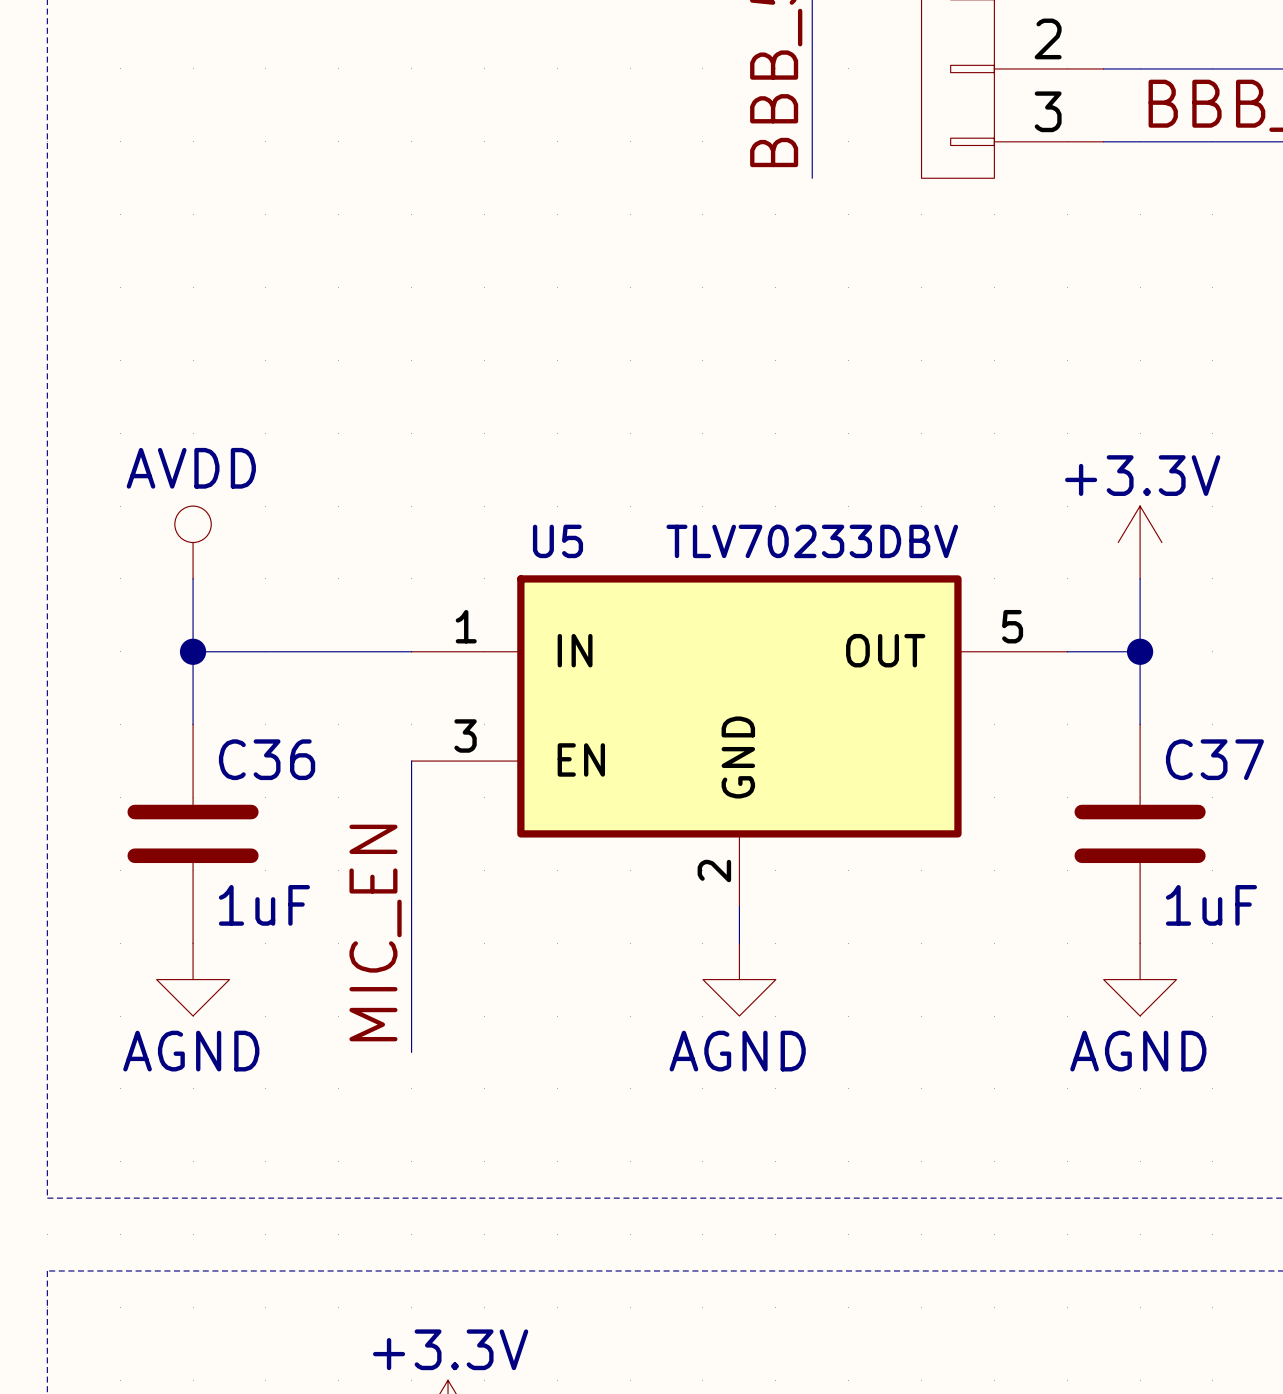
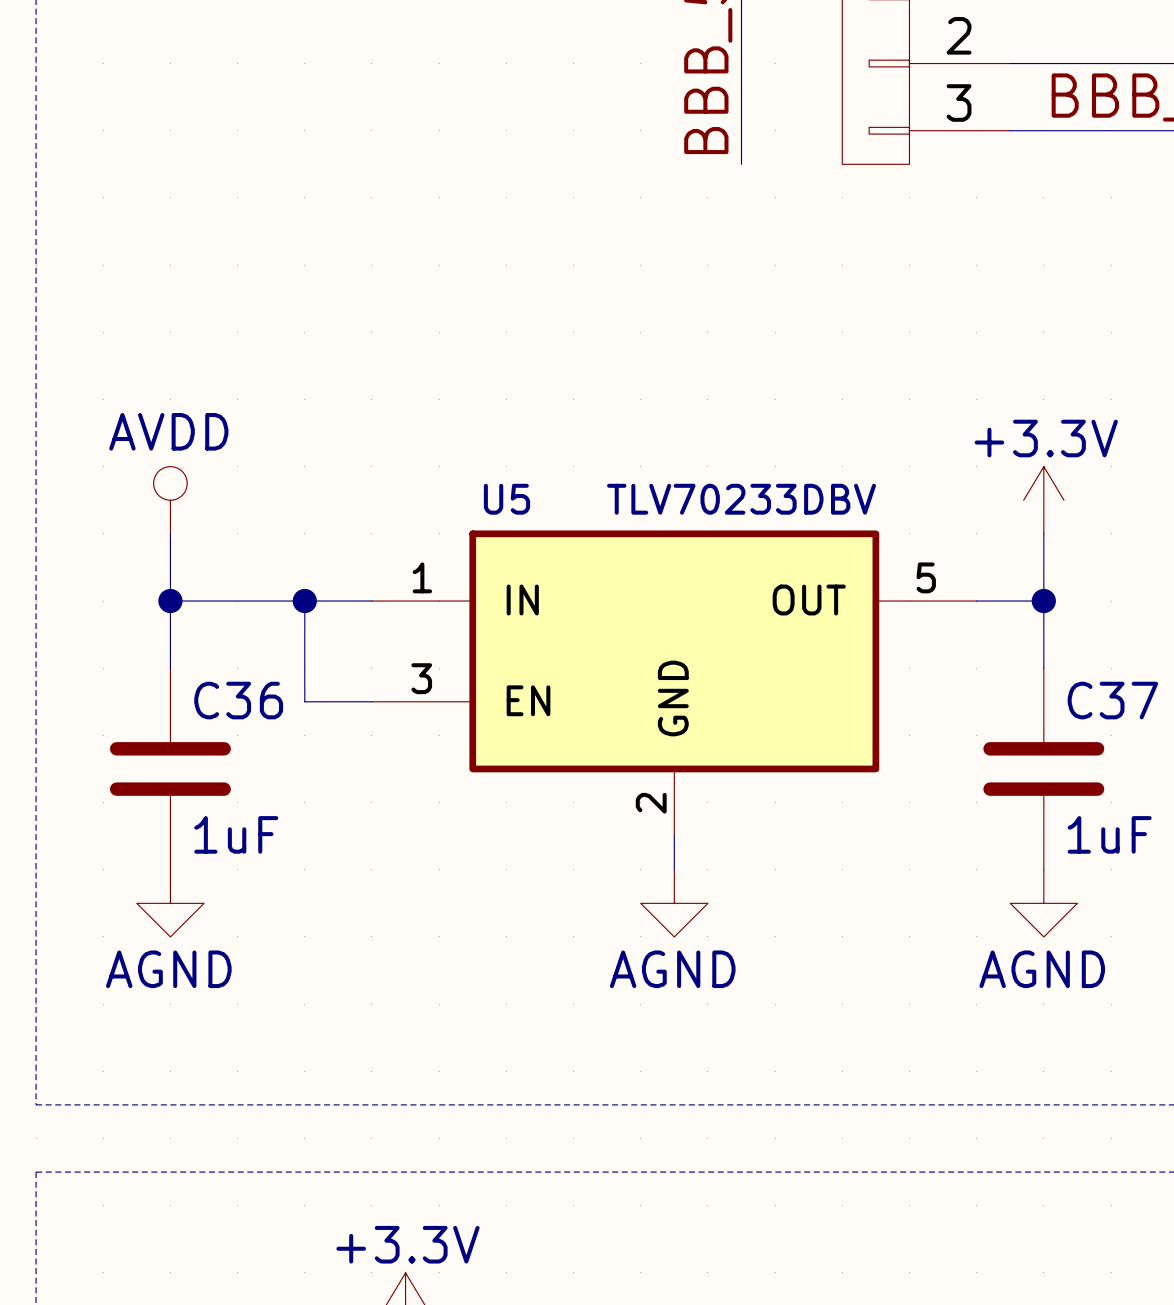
junction: none -> (304, 601)
wire: (411, 761) (411, 1052) -> (371, 701) (304, 701) (304, 601)
label: MIC_EN (375, 933) -> none

